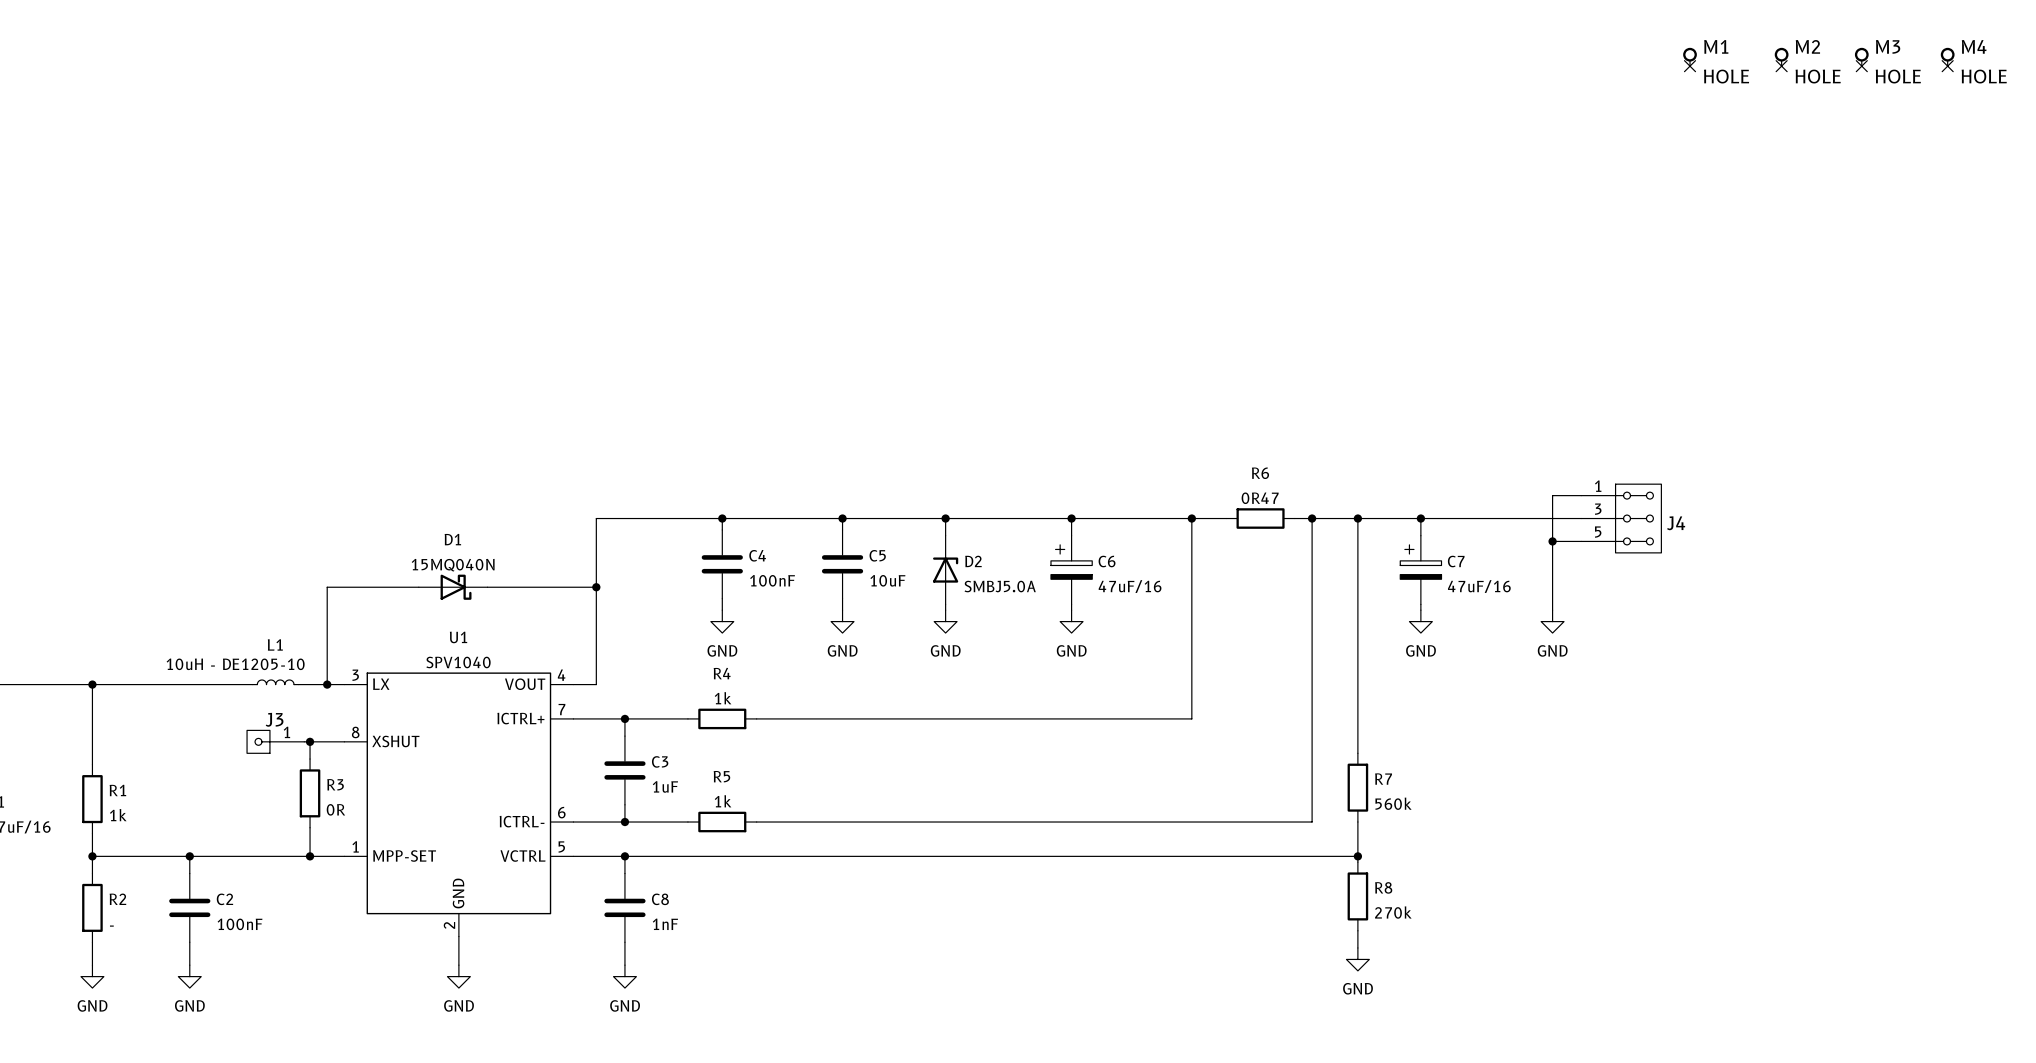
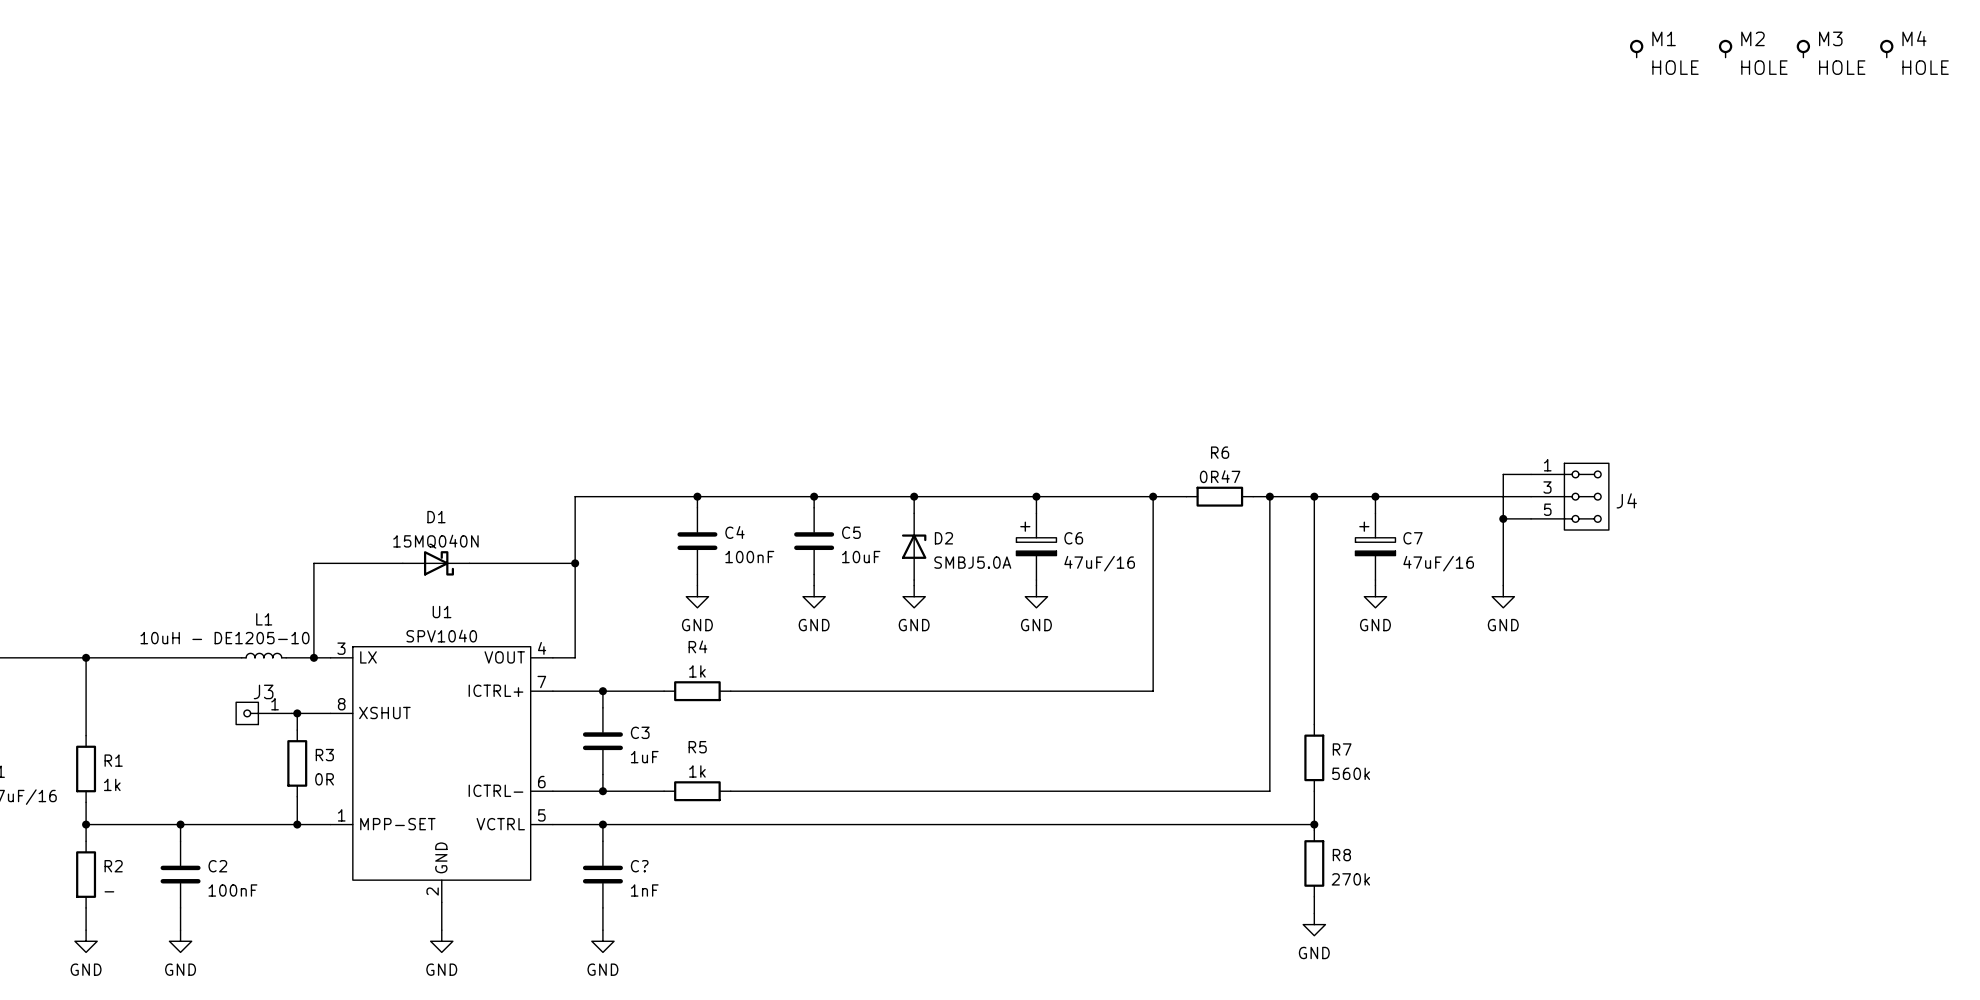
no-connect mark: (1690, 66) -> none
no-connect mark: (1781, 66) -> none
no-connect mark: (1861, 66) -> none
no-connect mark: (1947, 66) -> none
C8 name: C8 (660, 899) -> C? (639, 866)

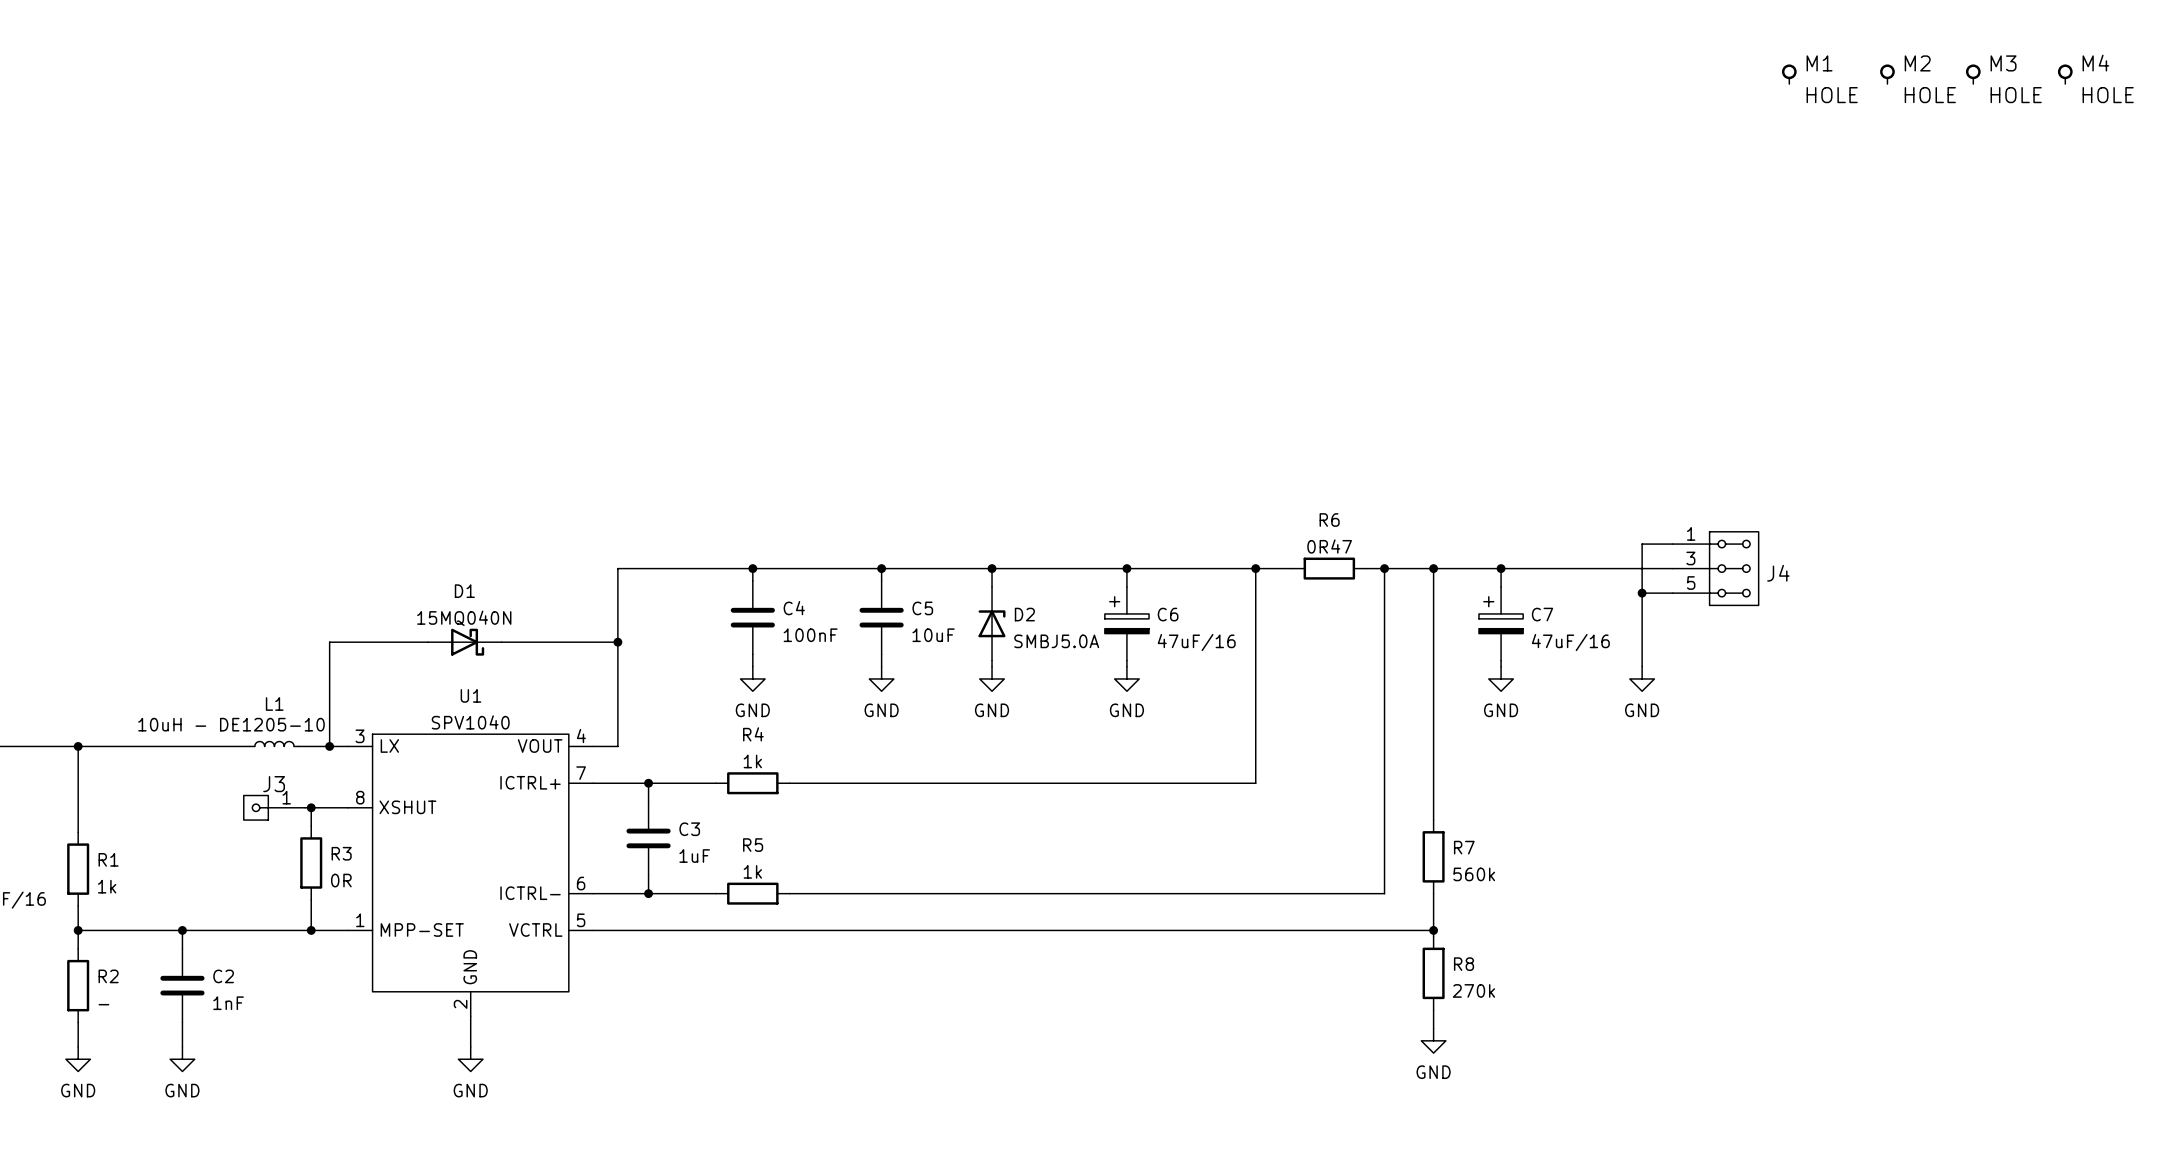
wire: (602, 824) (602, 841) -> none
junction: (602, 824) -> none
C?: 1nF (602, 874) -> none
C2 value: 100nF (232, 890) -> 1nF (228, 1003)
wire: (602, 907) (602, 930) -> none
power symbol: GND (602, 941) -> none

